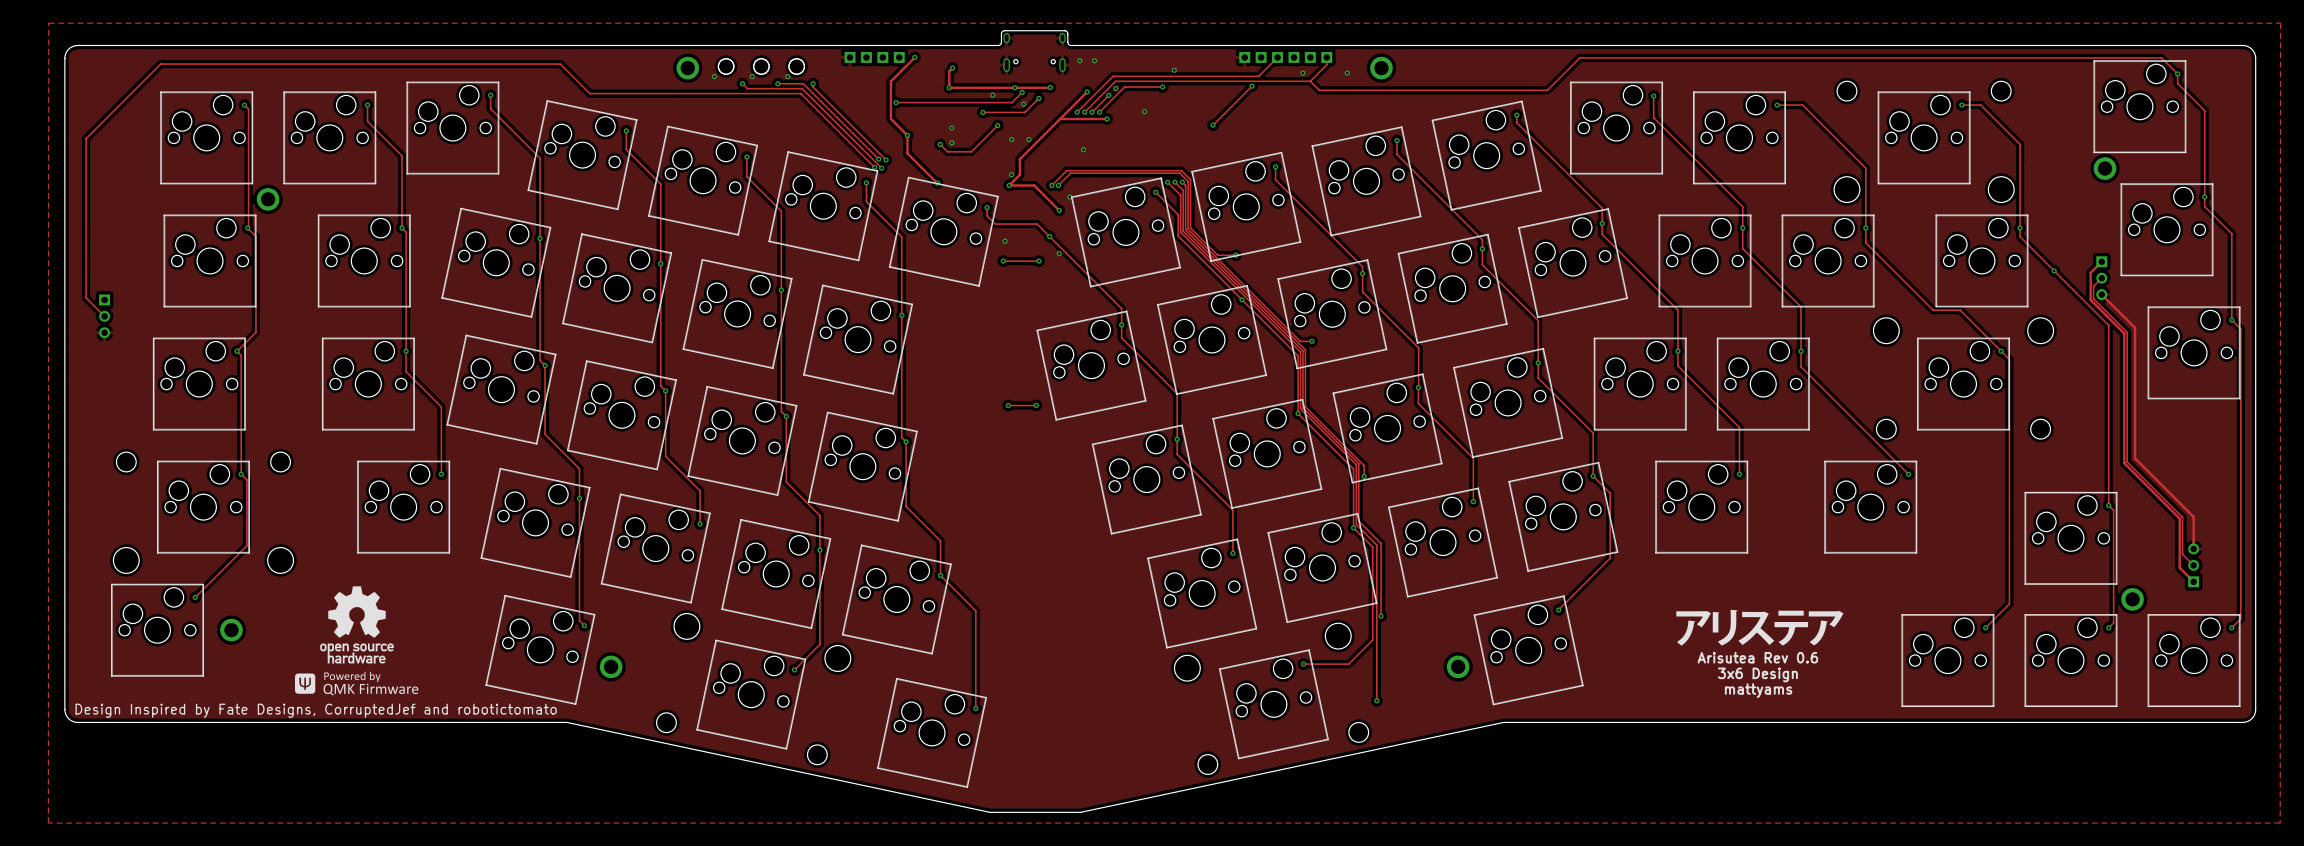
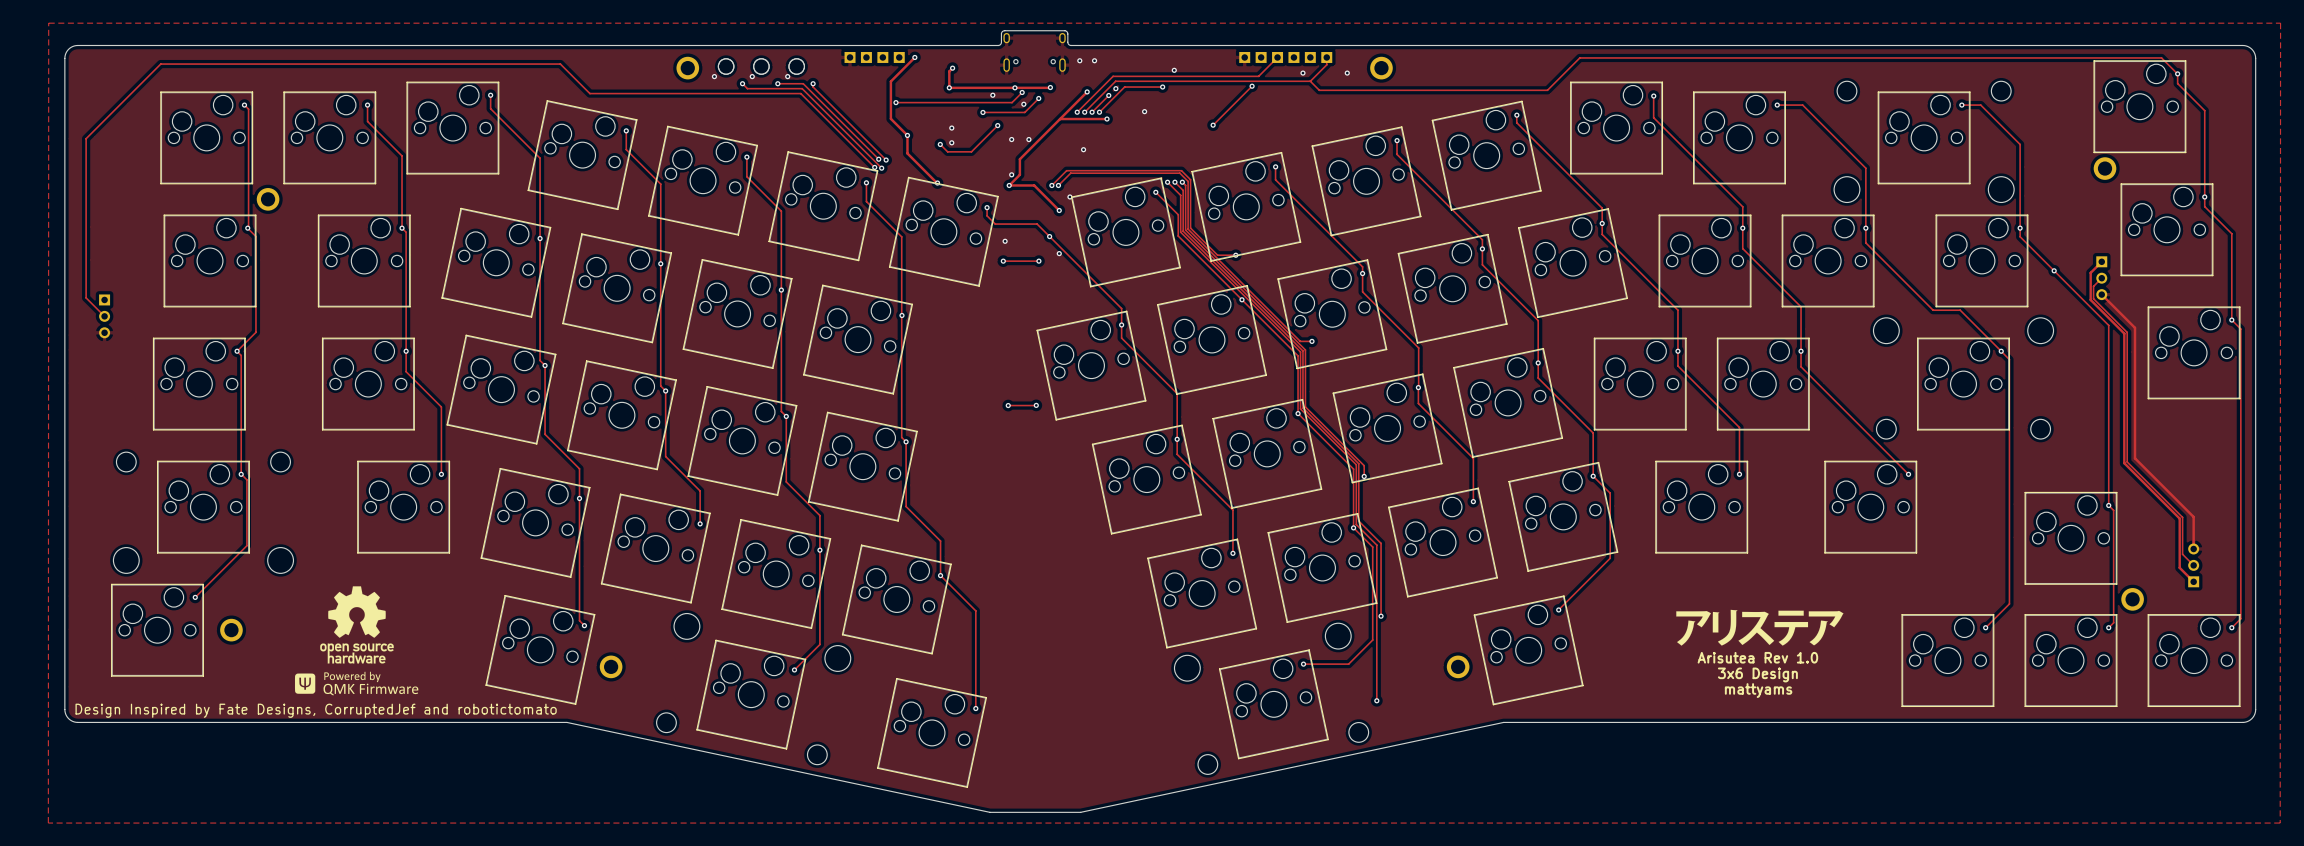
text: Arisutea Rev 0.6 (1757, 657) -> Arisutea Rev 1.0 (1757, 657)

